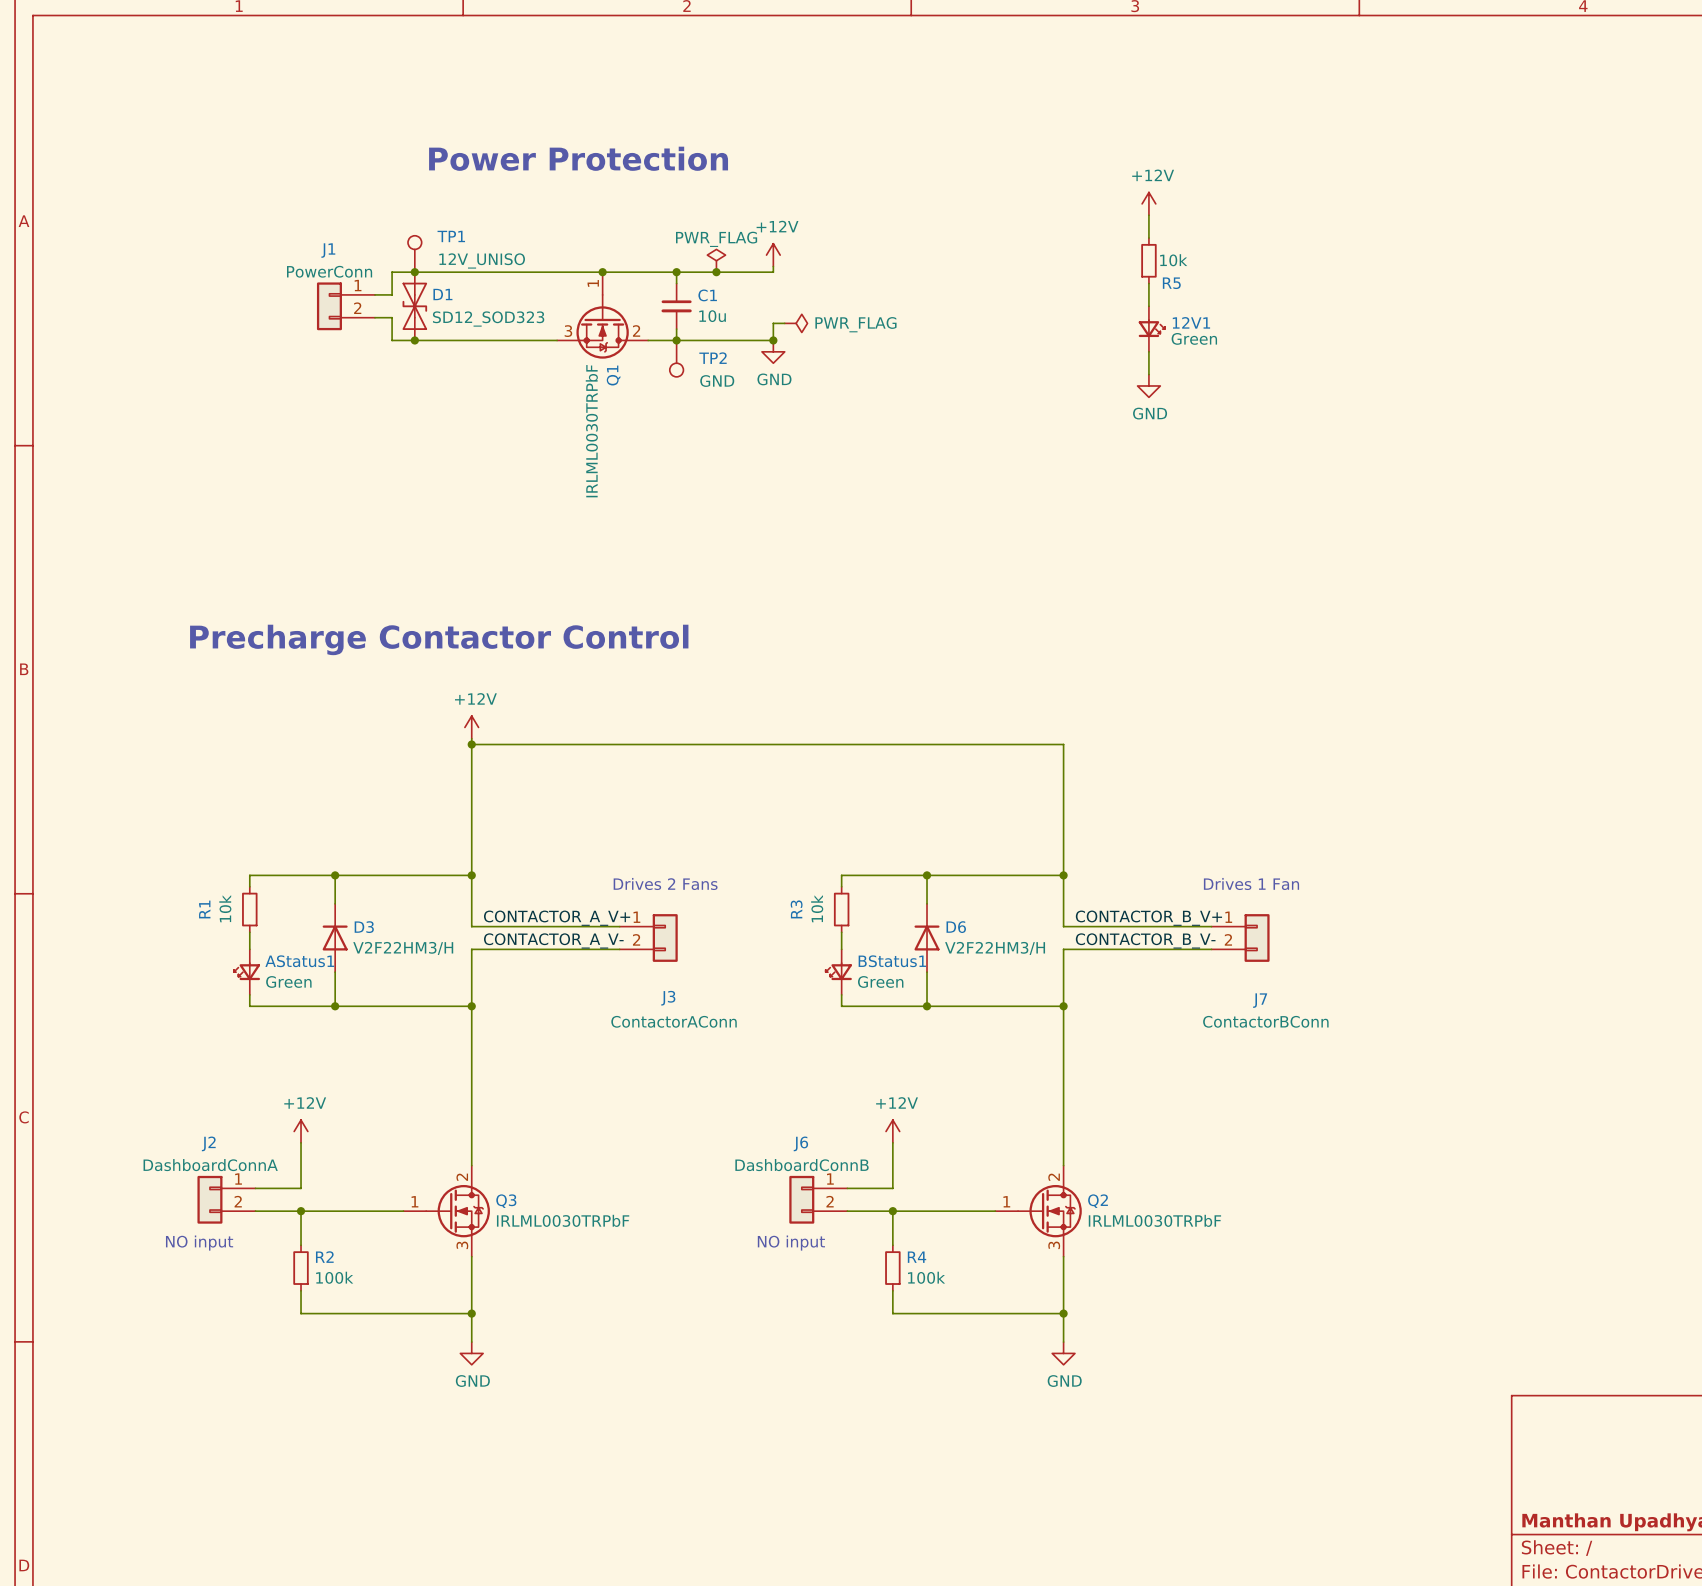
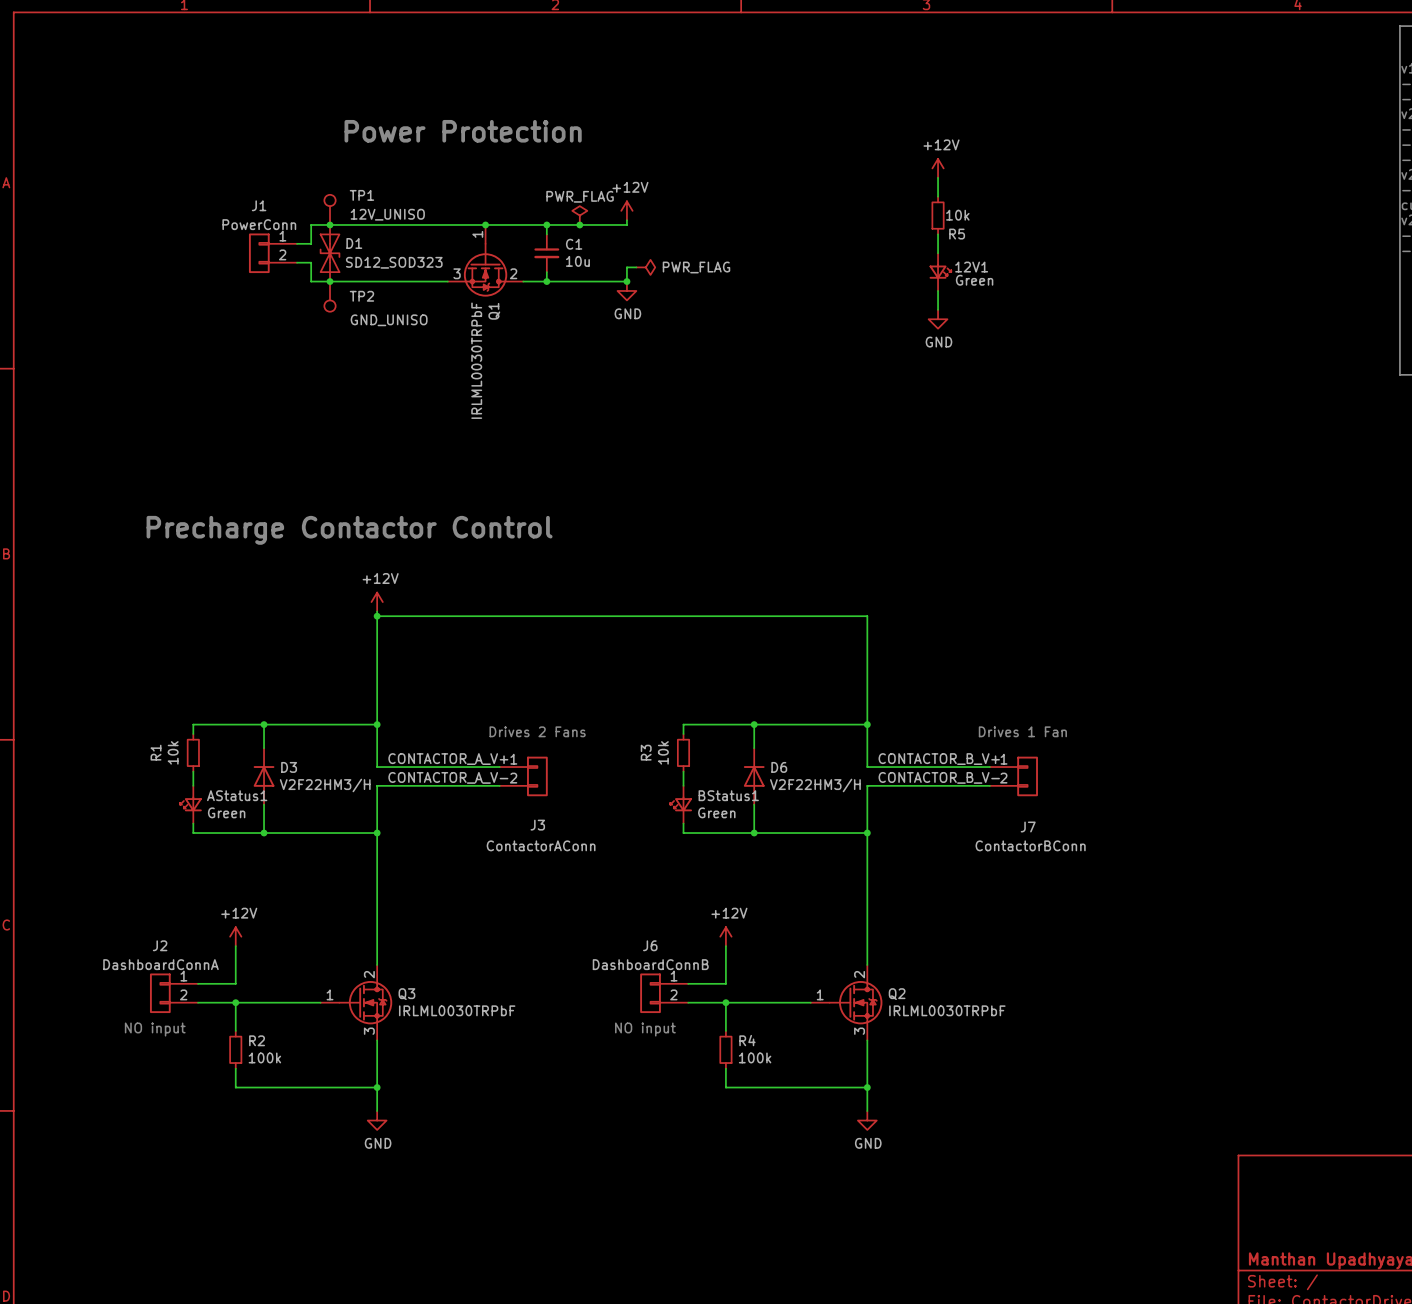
TP2 position: (676, 358) -> (330, 296)
TP2 value: GND (717, 381) -> GND_UNISO (389, 320)

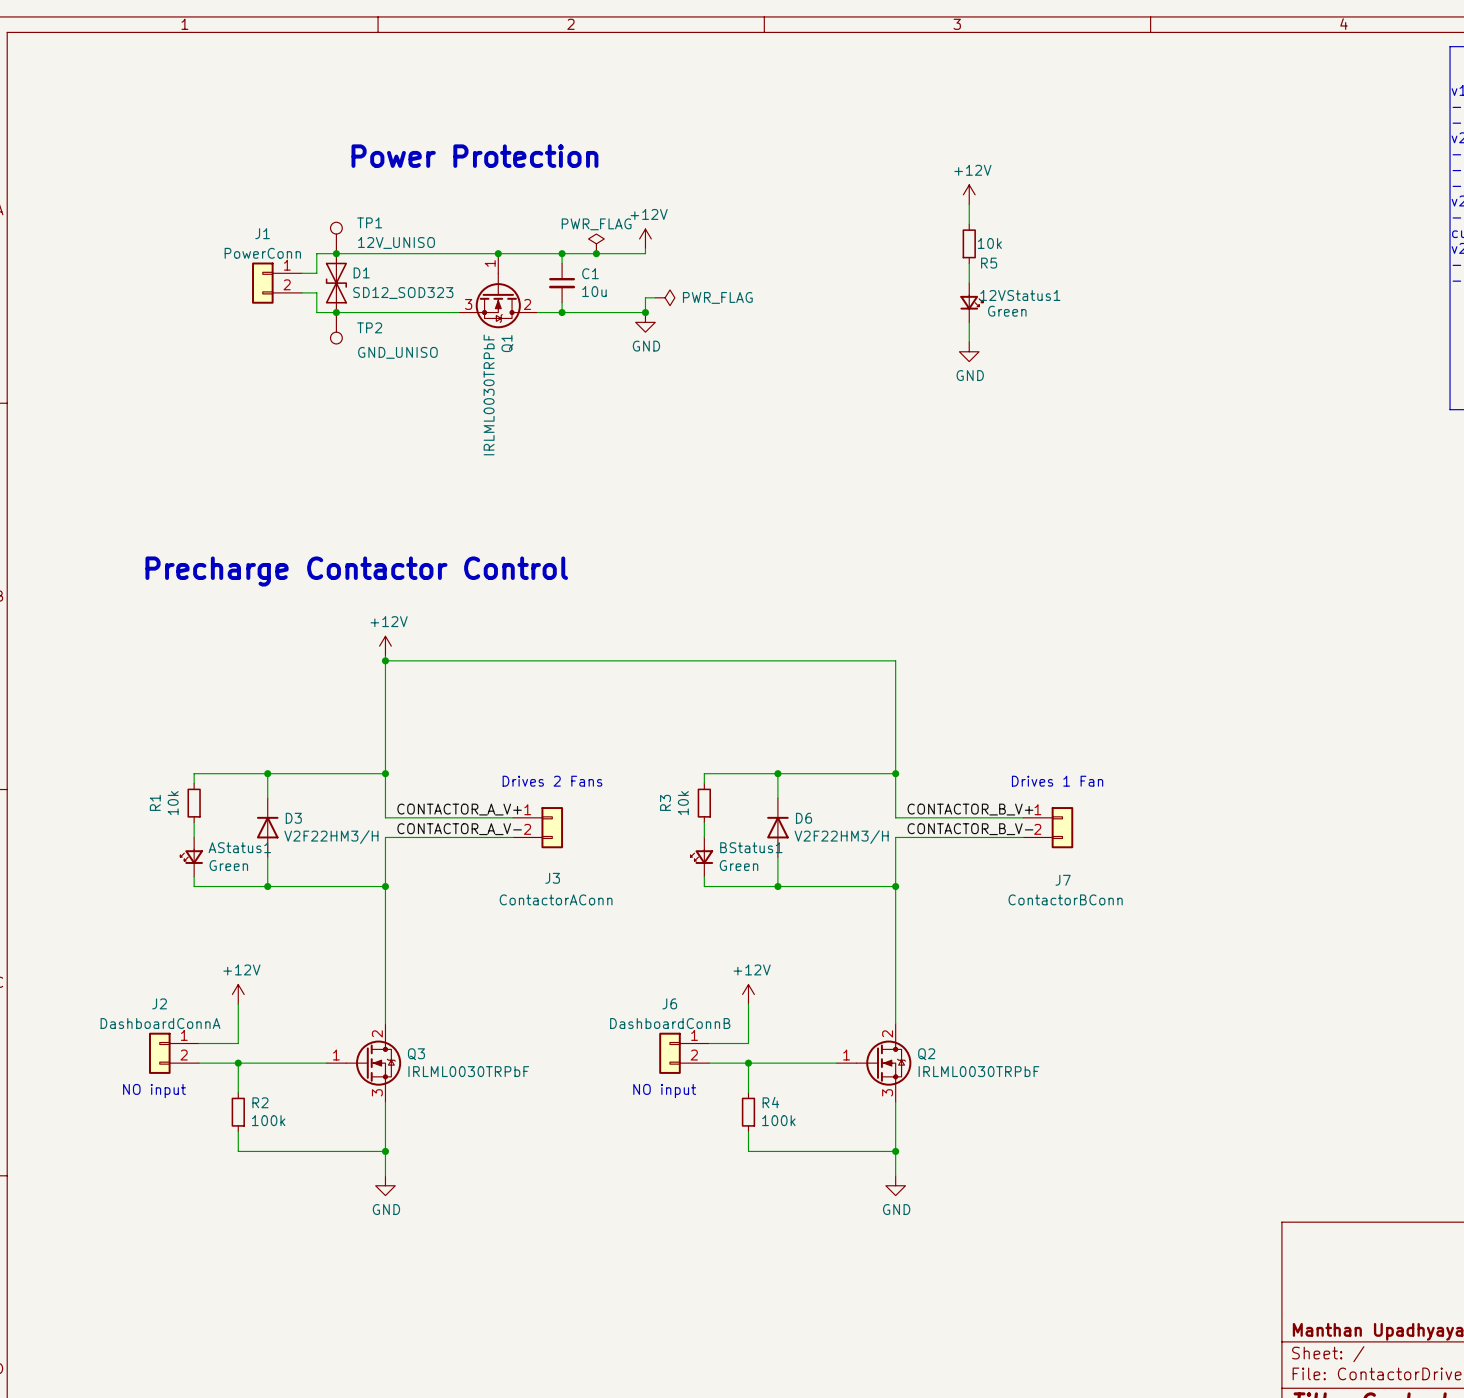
12V1 name: 12V1 (971, 267) -> 12VStatus1 (1020, 295)

